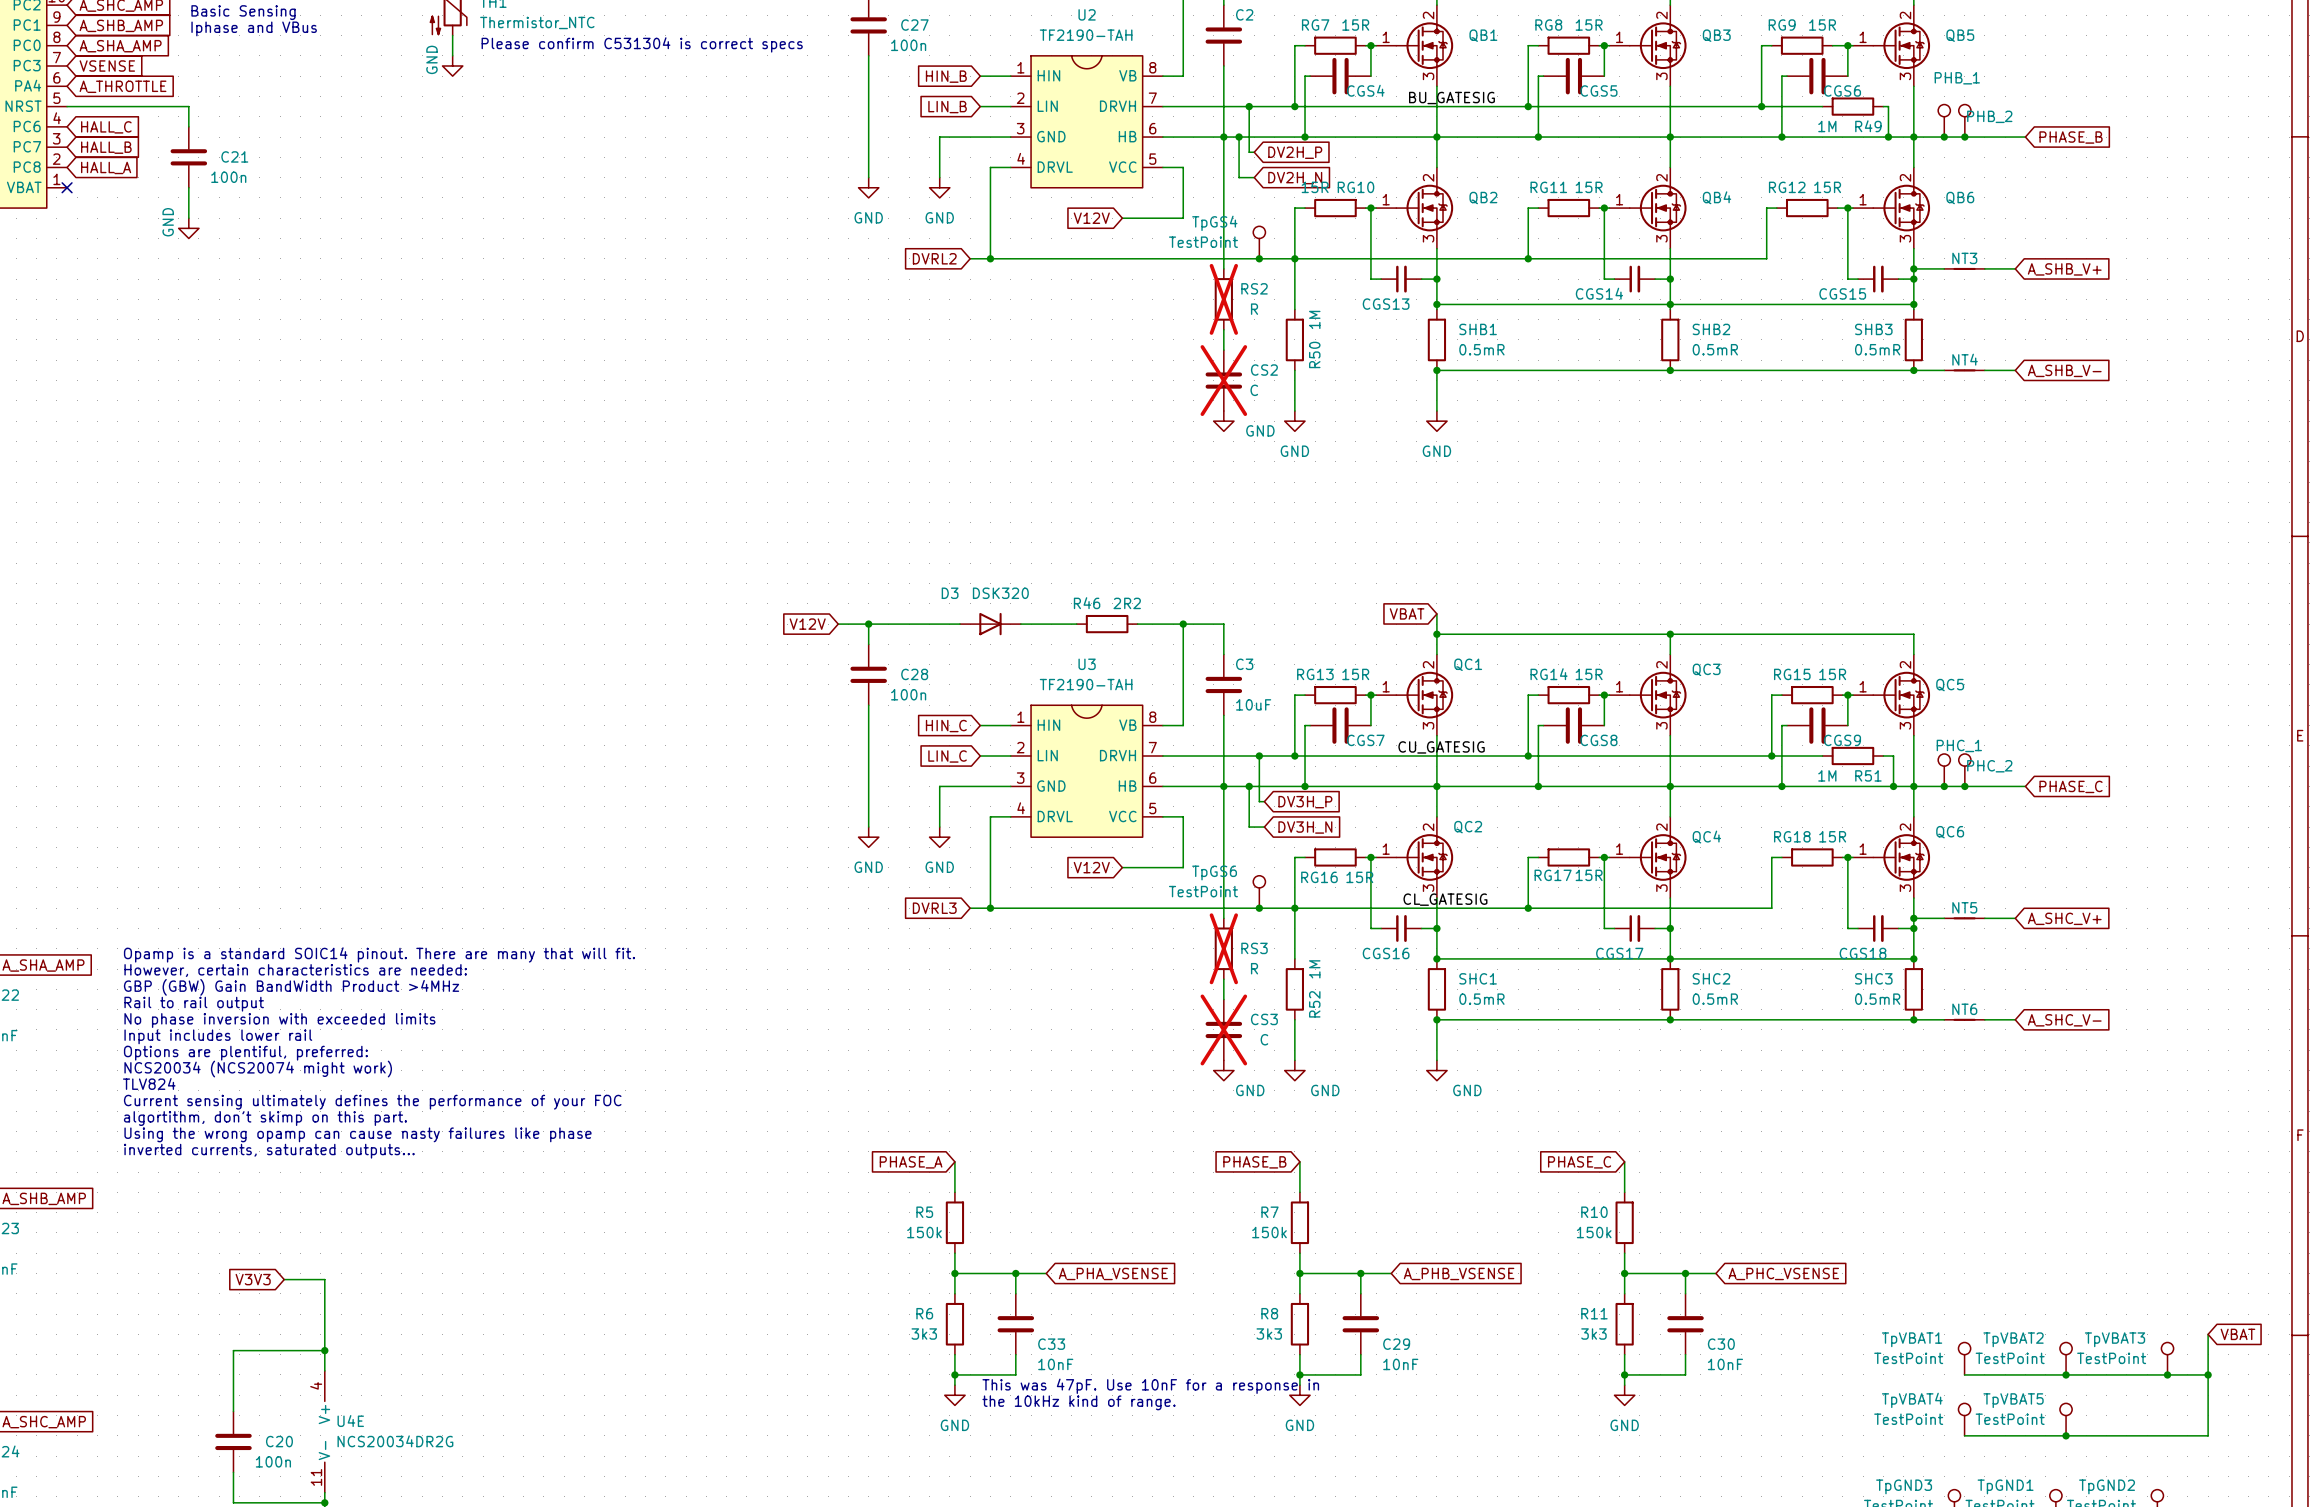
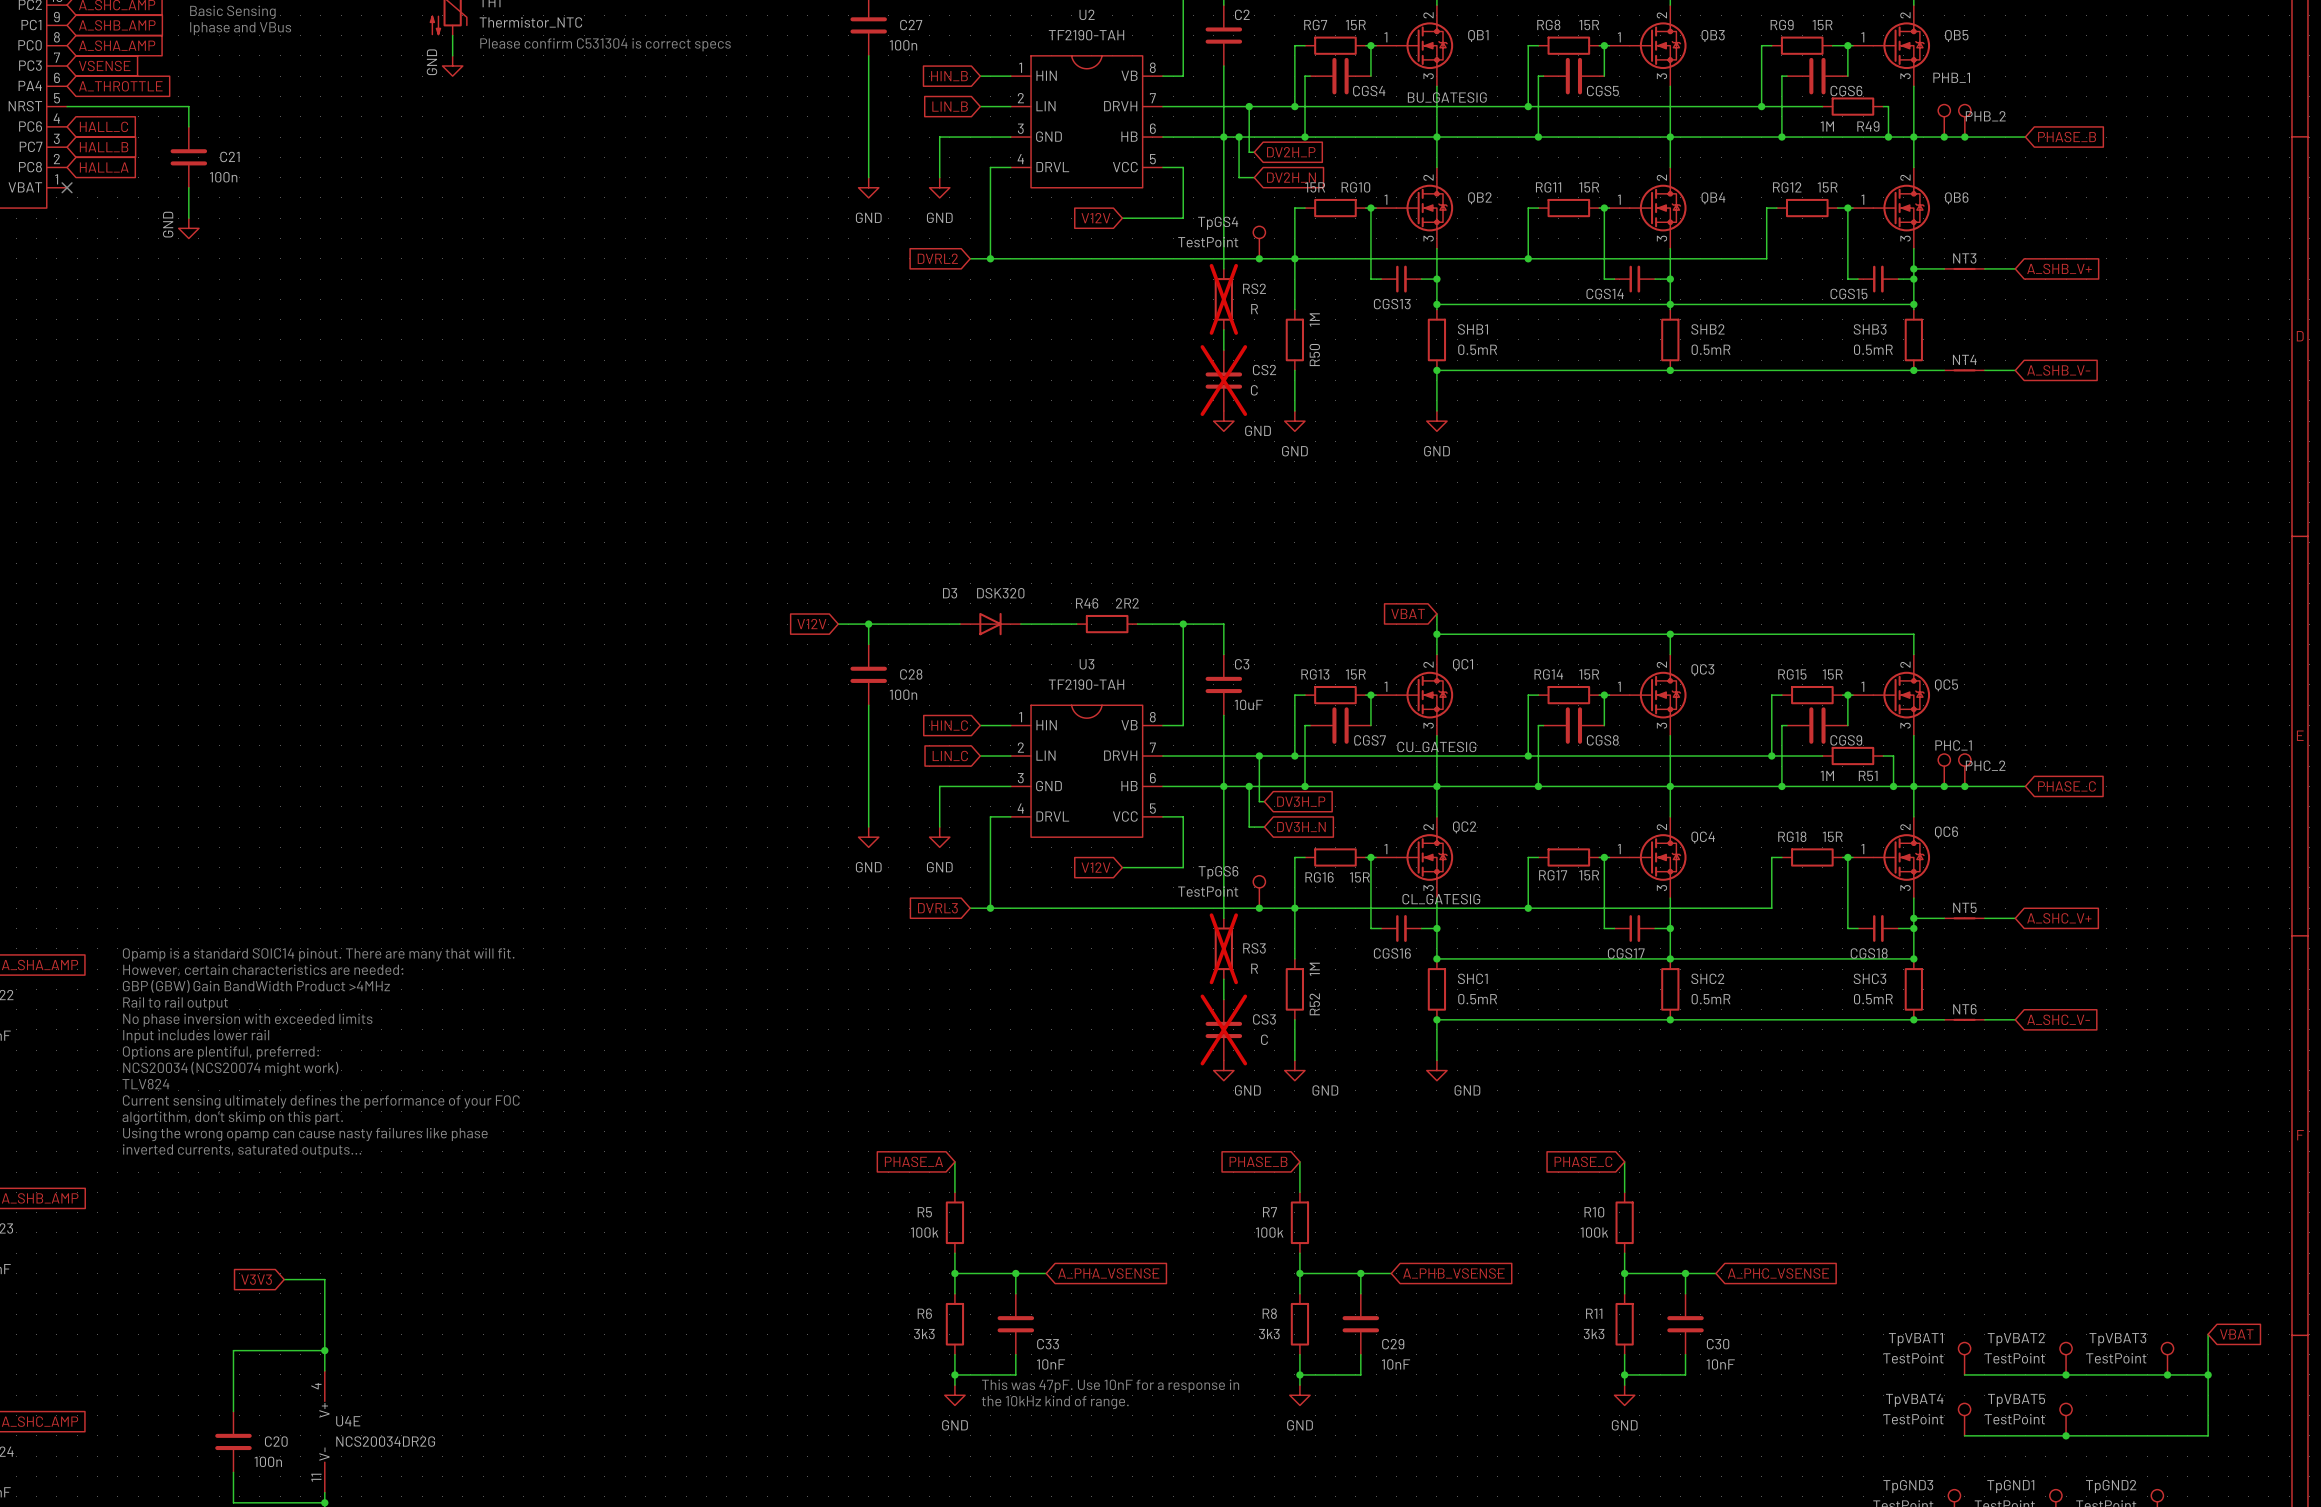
R5 value: 150k (924, 1232) -> 100k (924, 1232)
R7 value: 150k (1269, 1232) -> 100k (1269, 1232)
R10 value: 150k (1594, 1232) -> 100k (1594, 1232)

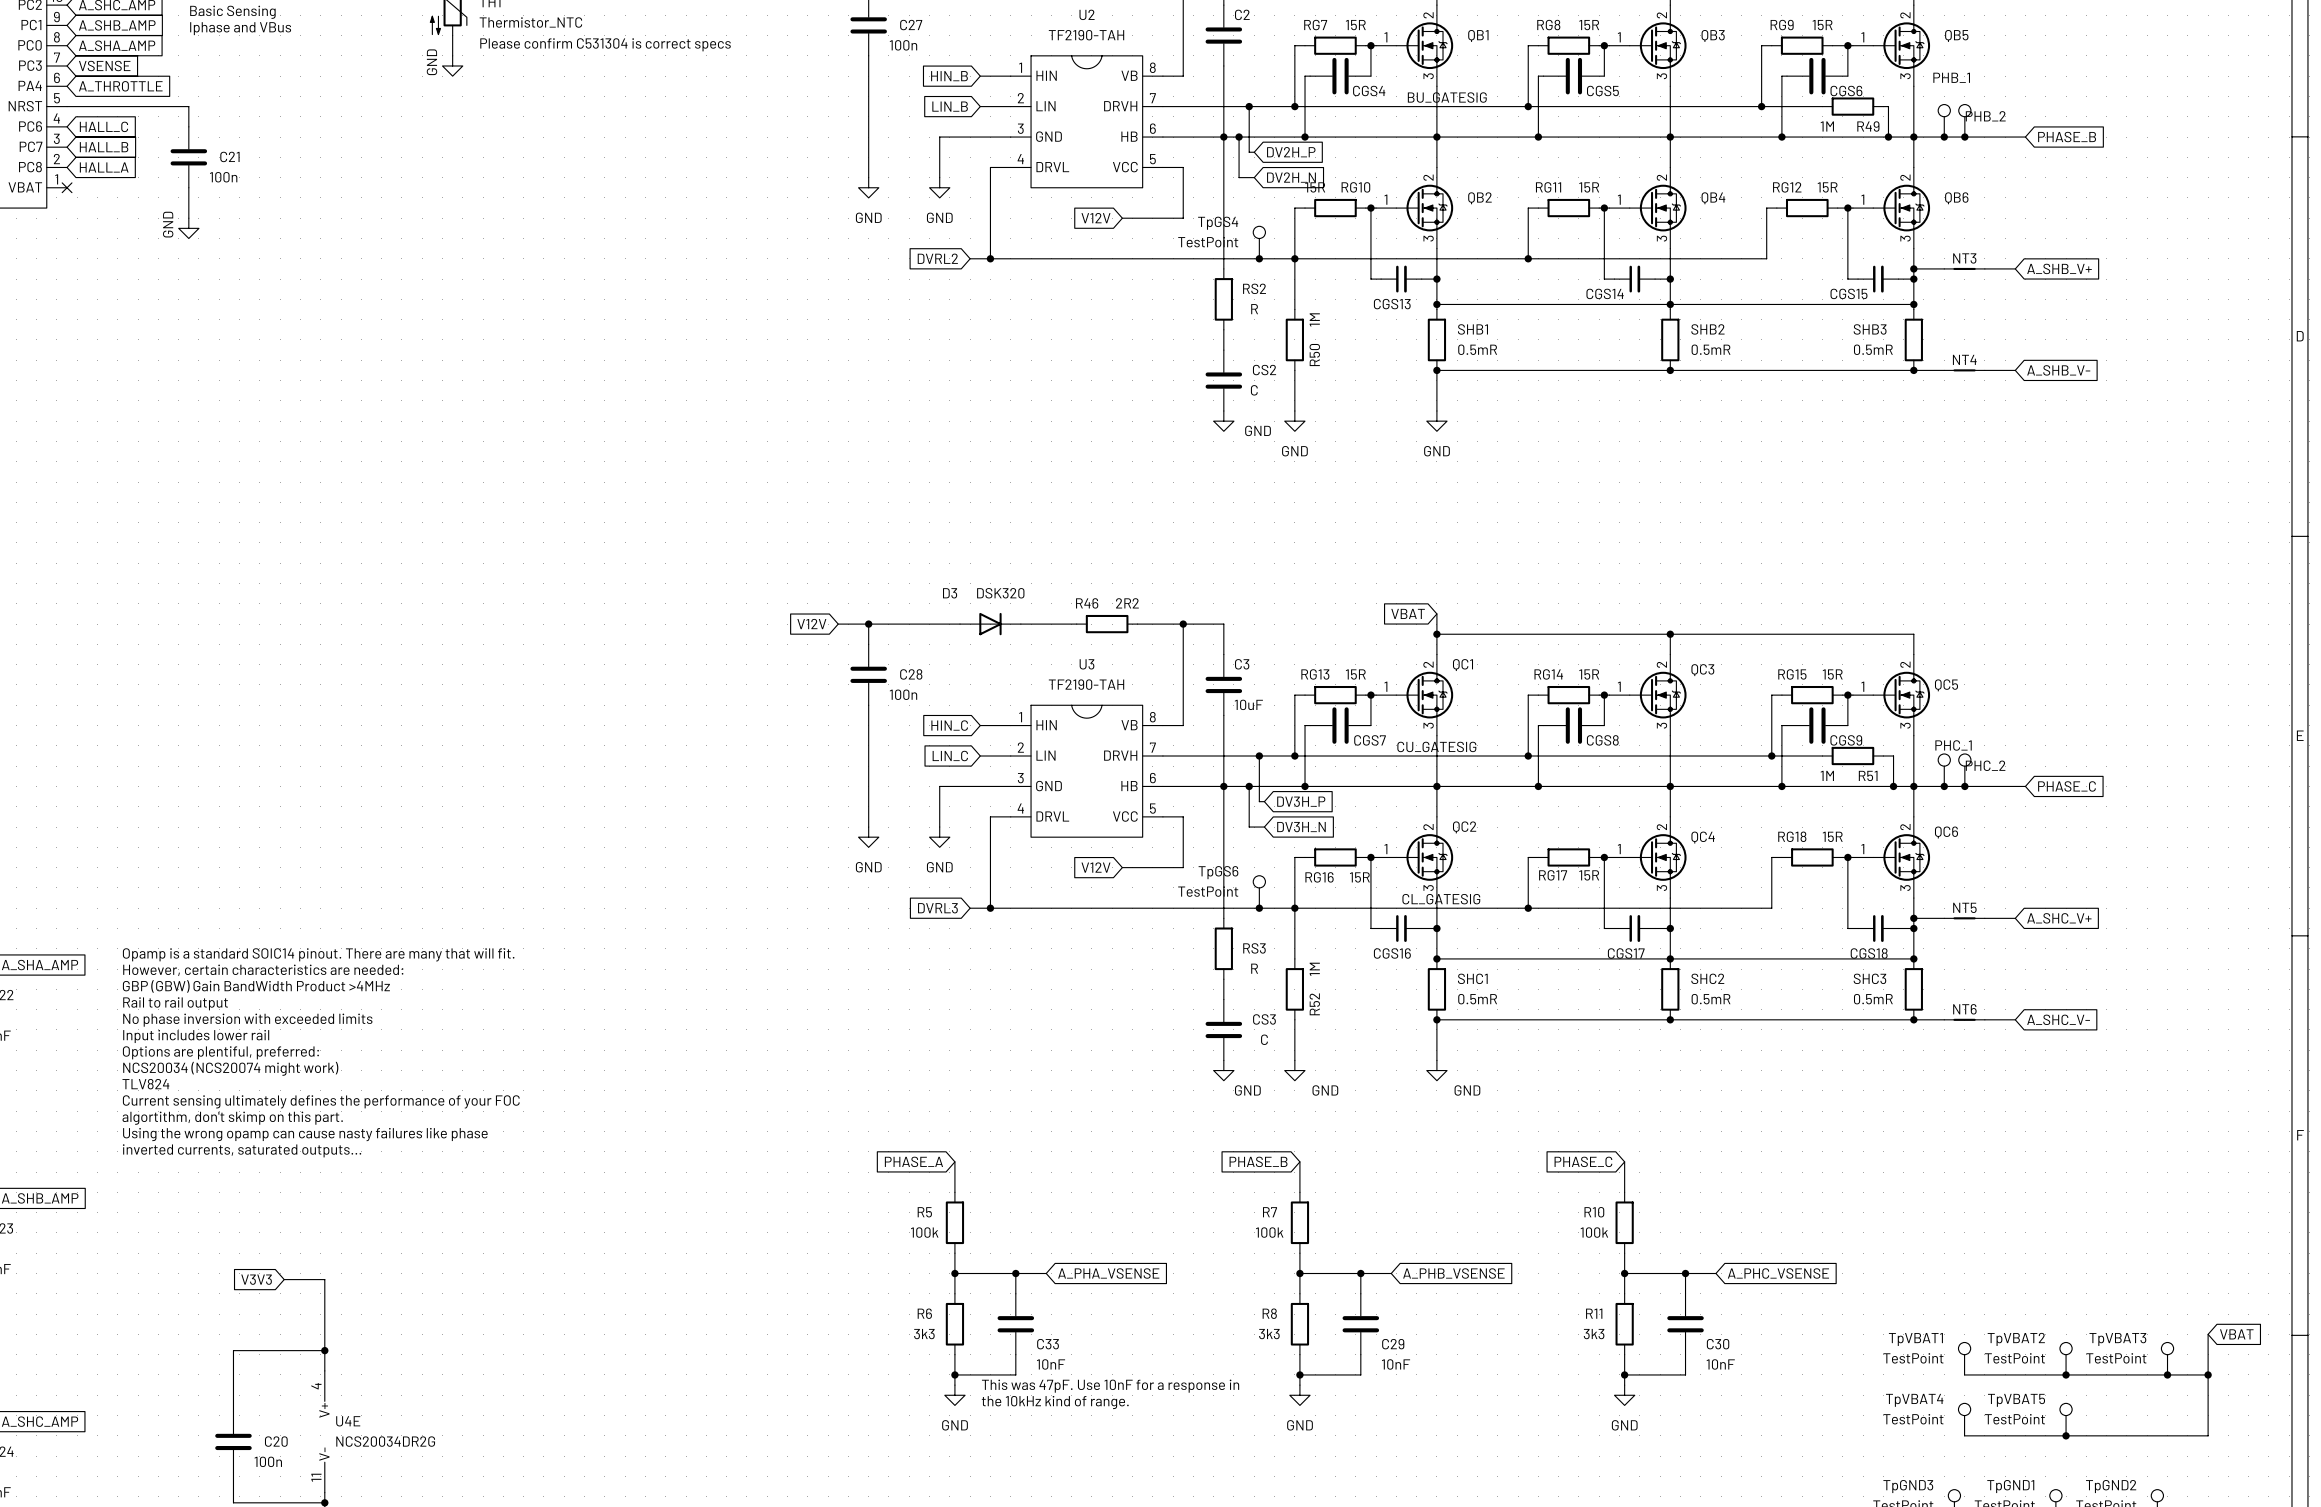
RS2 do-not-place cross: (1223, 299) -> none
CS2 do-not-place cross: (1223, 380) -> none
RS3 do-not-place cross: (1223, 948) -> none
CS3 do-not-place cross: (1223, 1029) -> none

